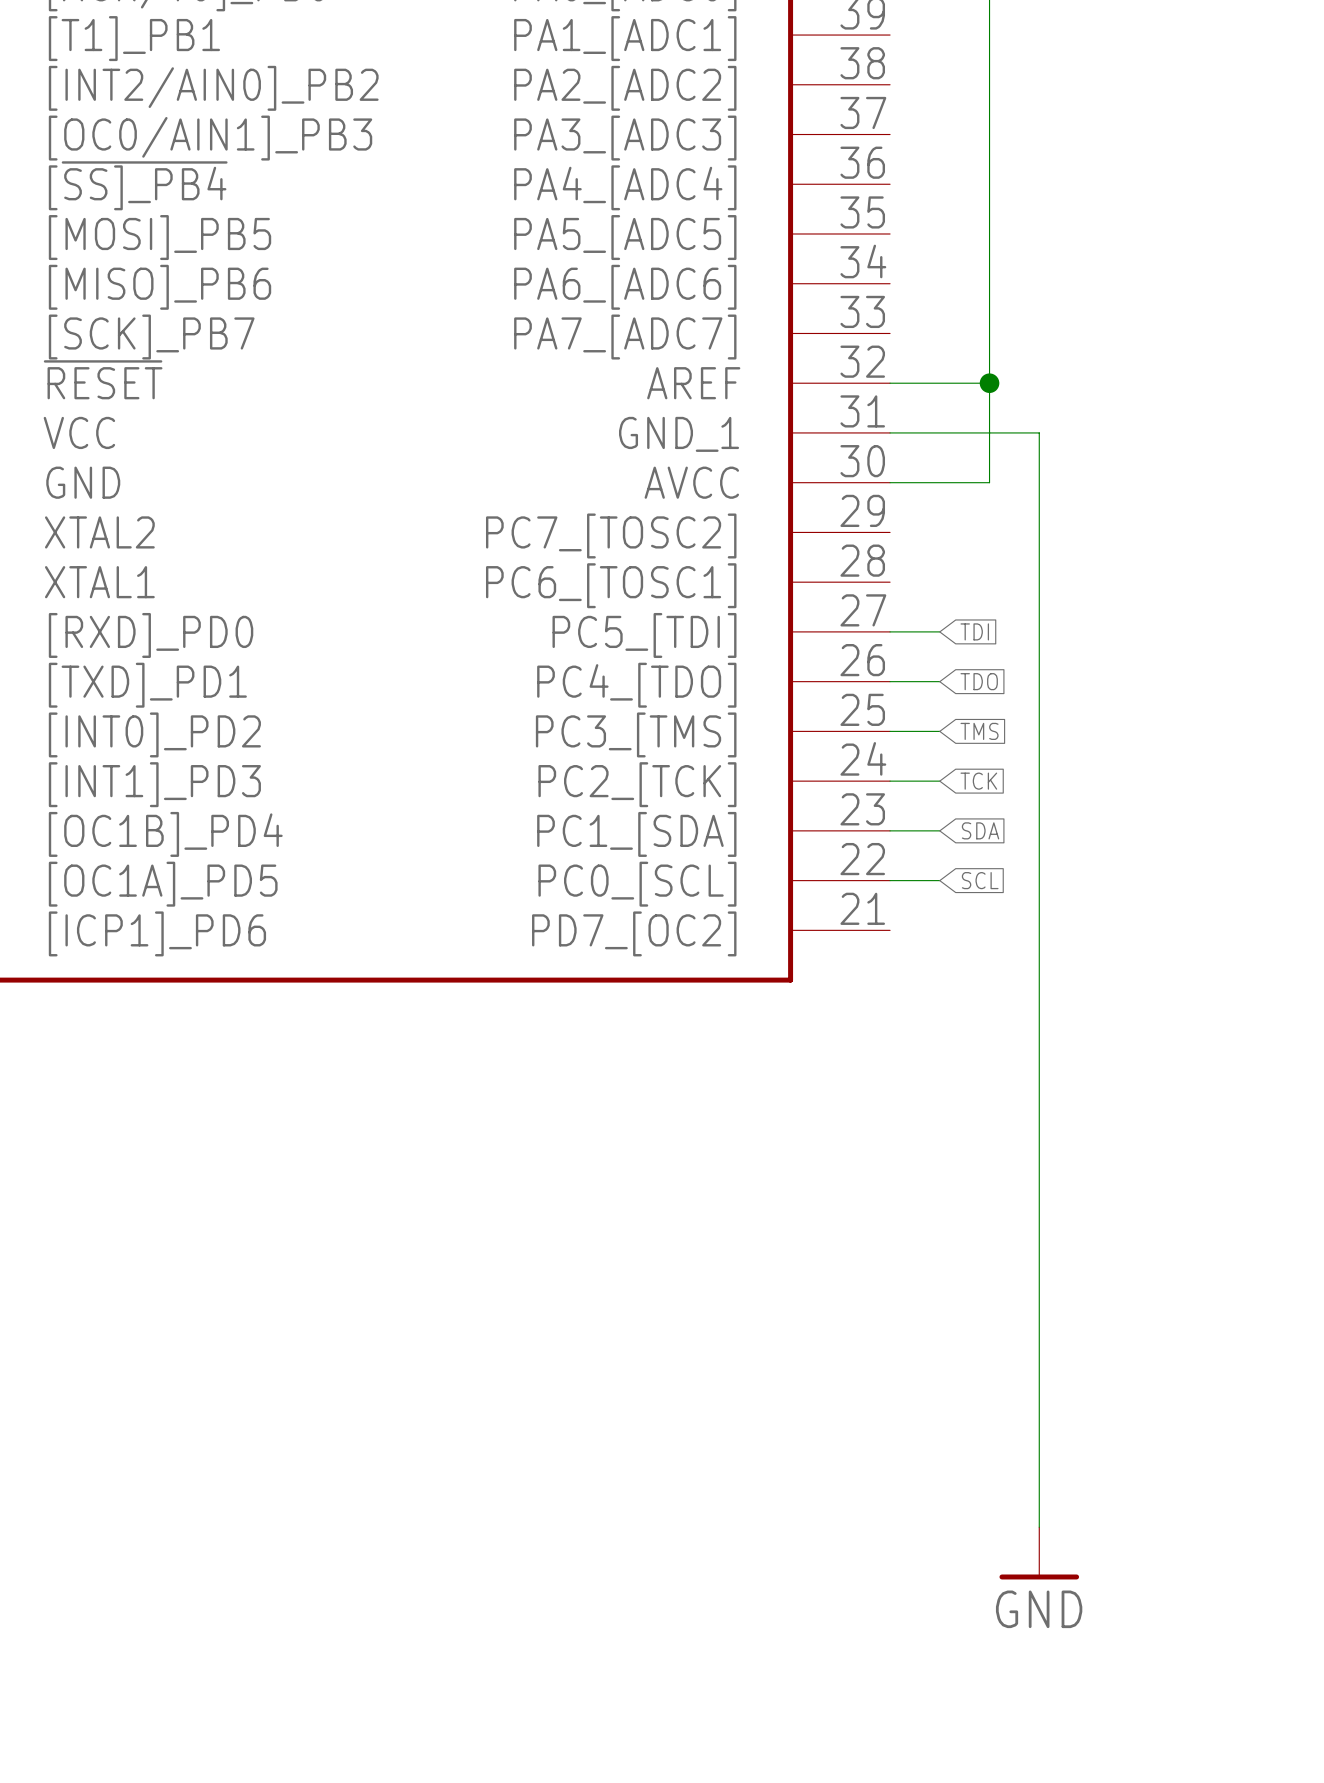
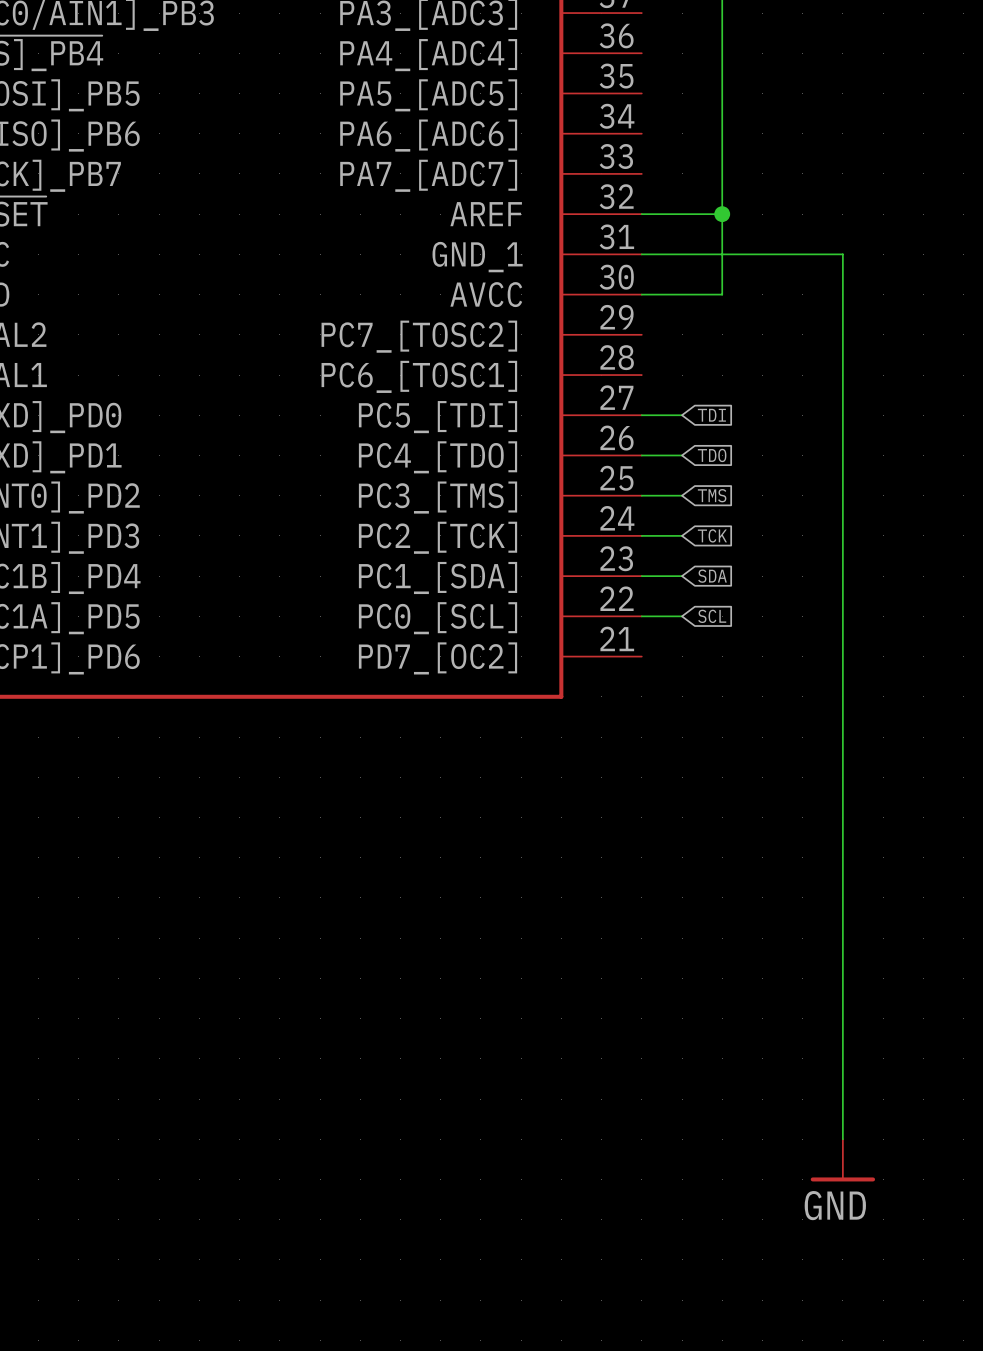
wire: (1039, 432) (1039, 1527) -> (762, 254) (842, 254) (842, 1139)
power symbol position: GND (1039, 1553) -> GND (842, 1160)

